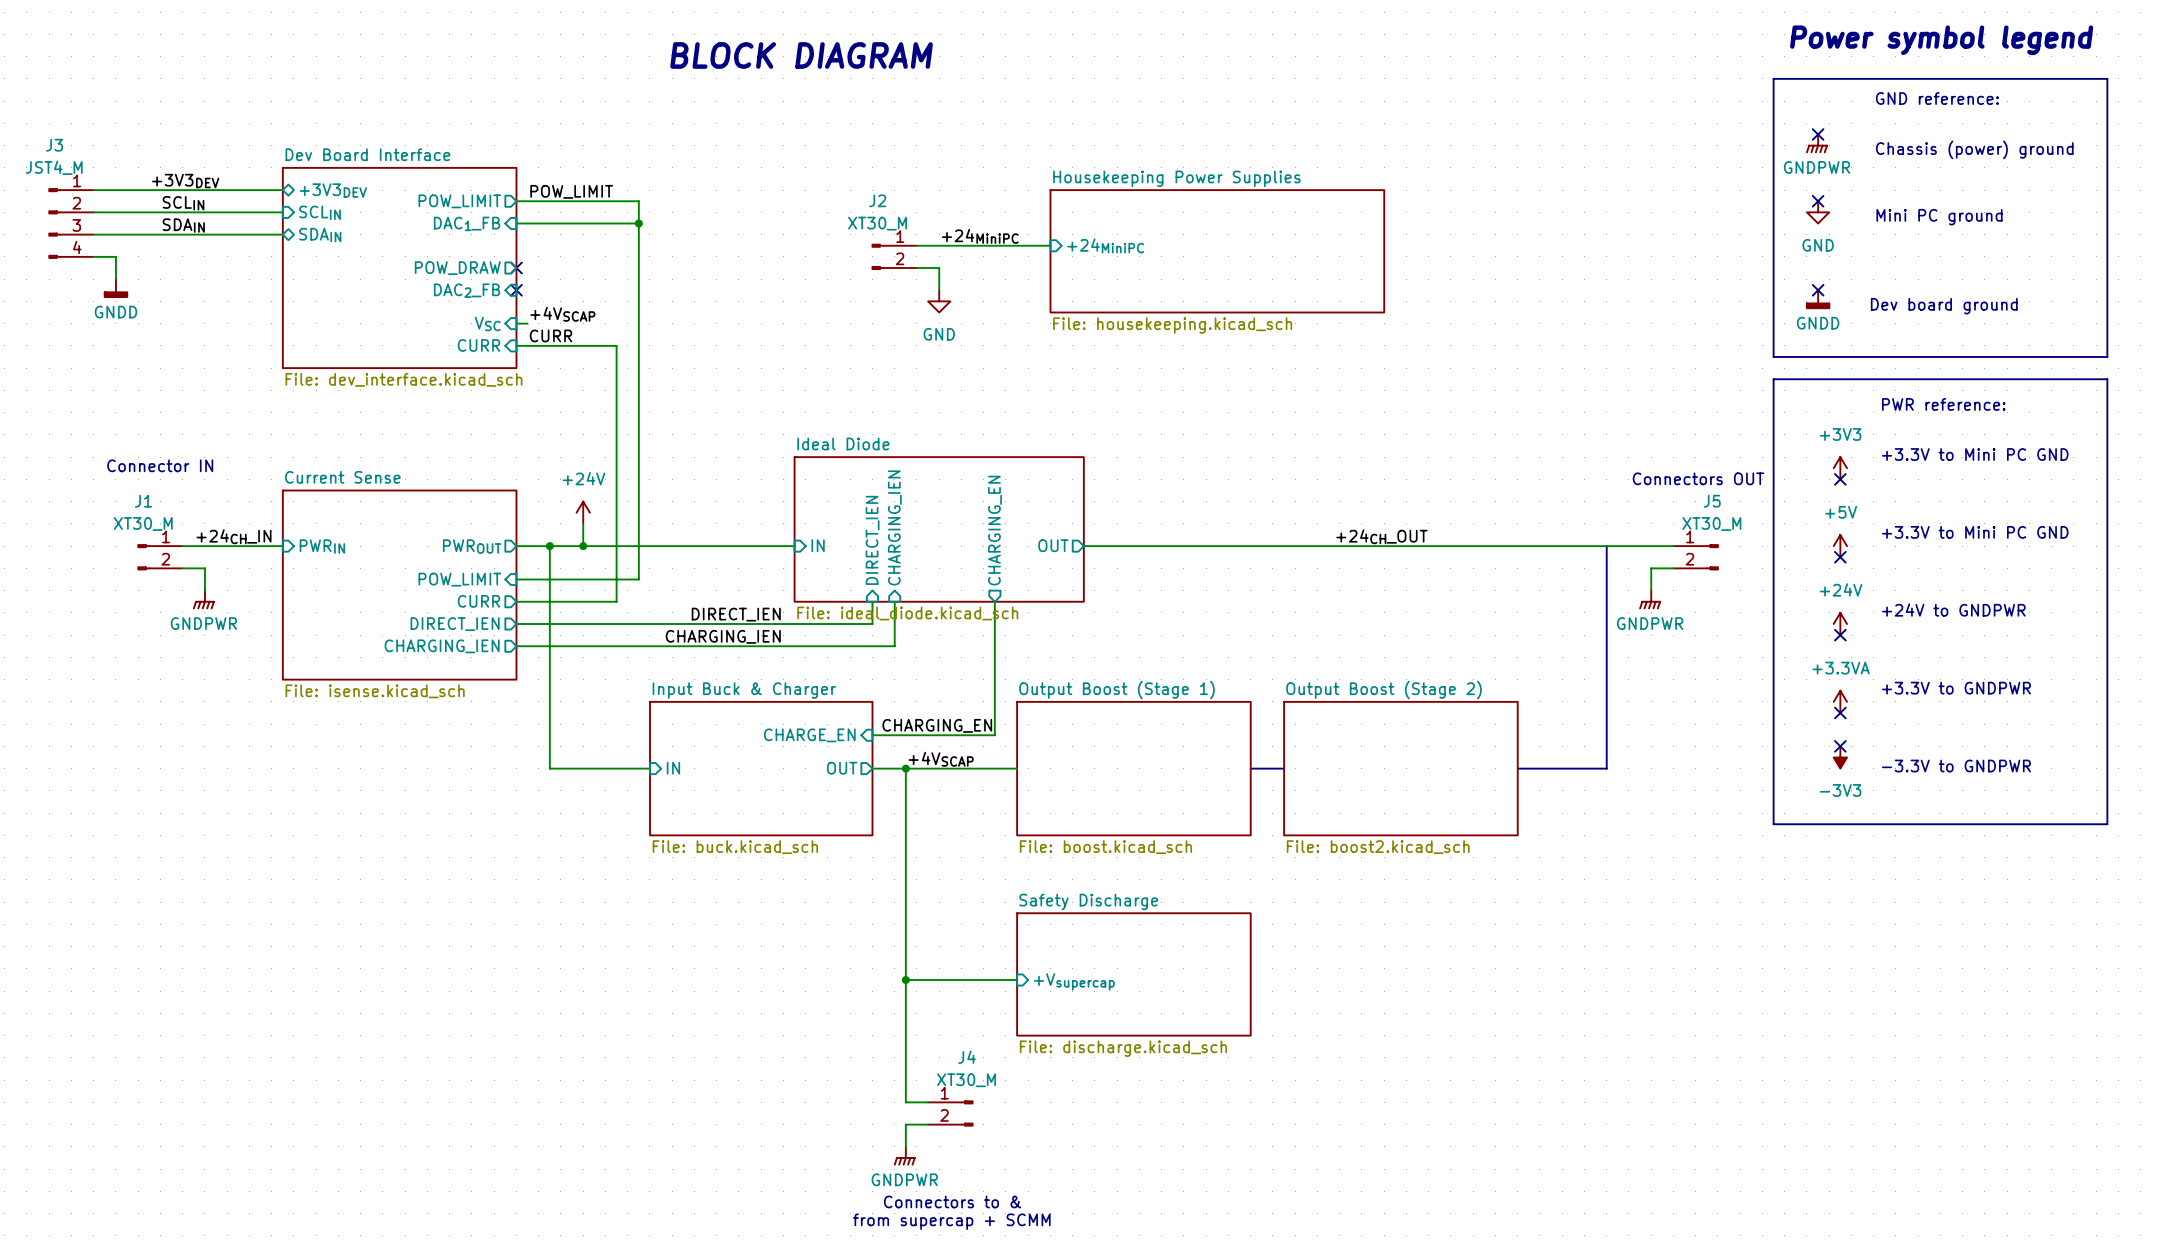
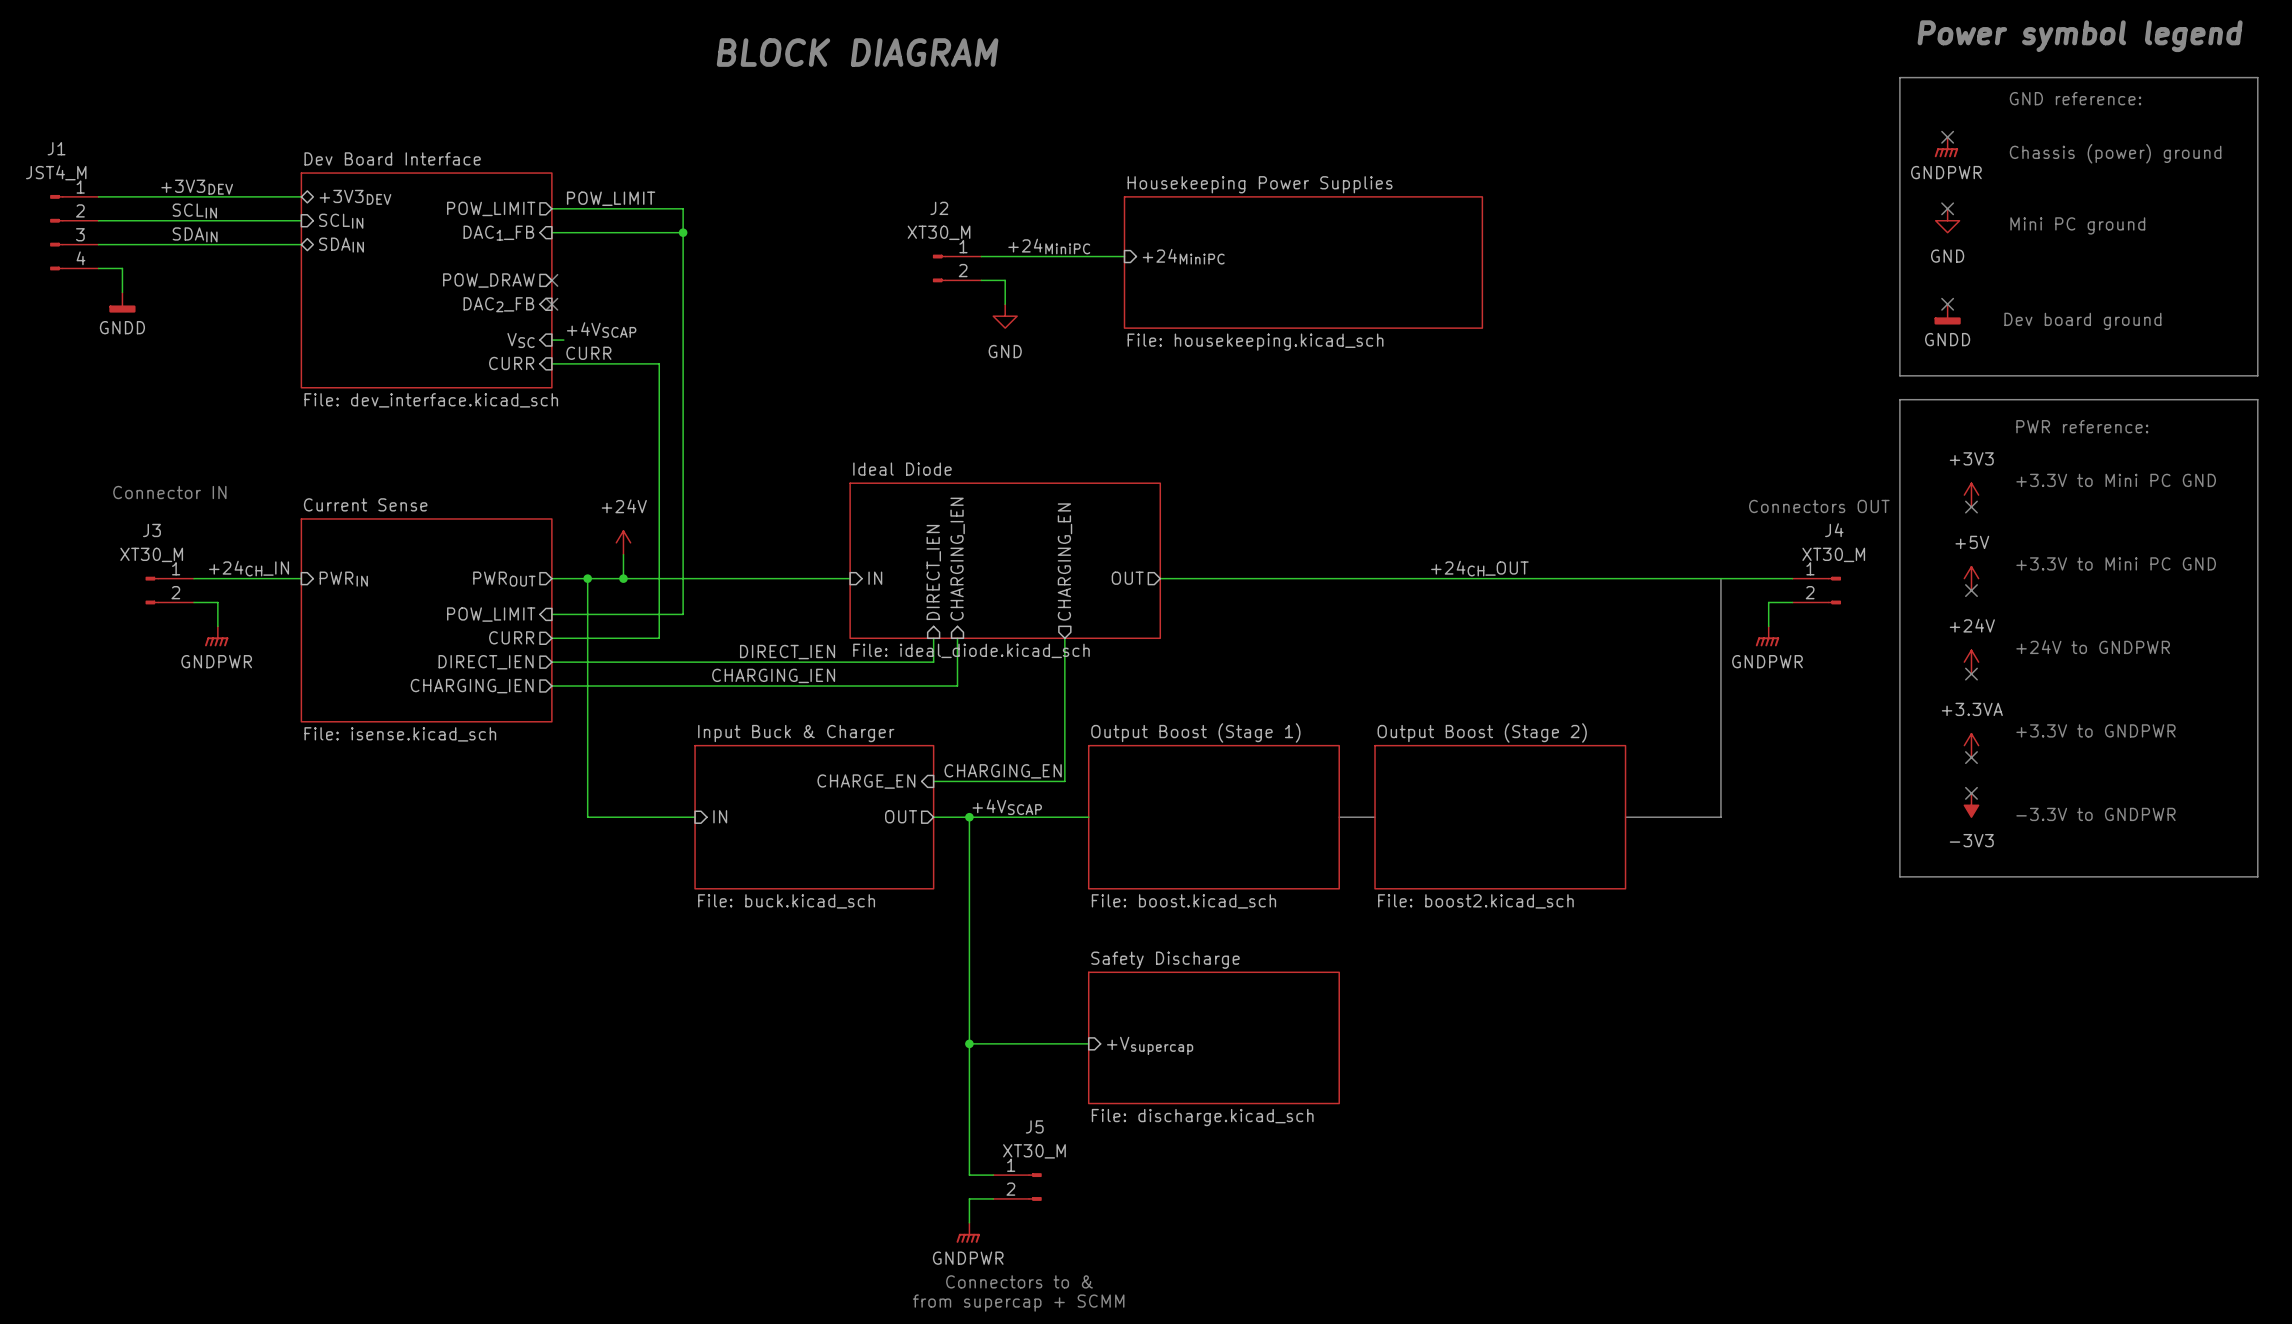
J3 name: J3 (54, 145) -> J1 (56, 148)
J1 name: J1 (143, 501) -> J3 (151, 530)
J5 name: J5 (1712, 501) -> J4 (1834, 530)
J4 name: J4 (967, 1057) -> J5 (1034, 1126)

